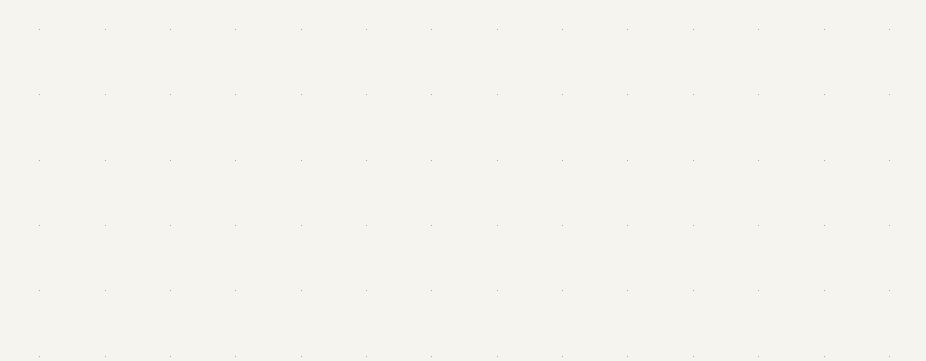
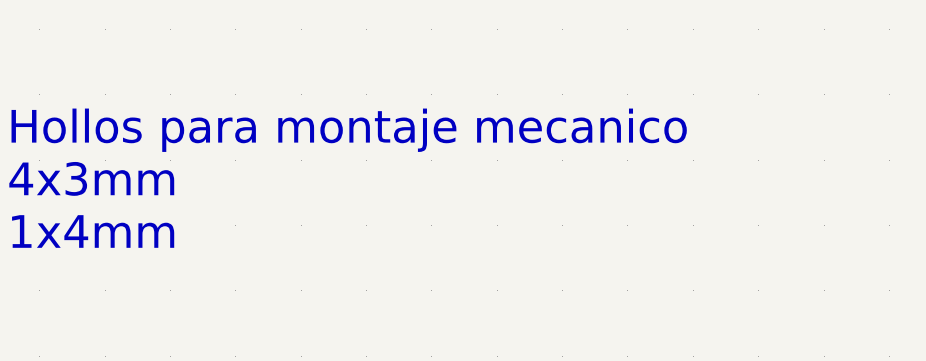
text: none -> Hollos para montaje mecanico (349, 130)
text: none -> 4x3mm (91, 178)
text: none -> 1x4mm (93, 231)

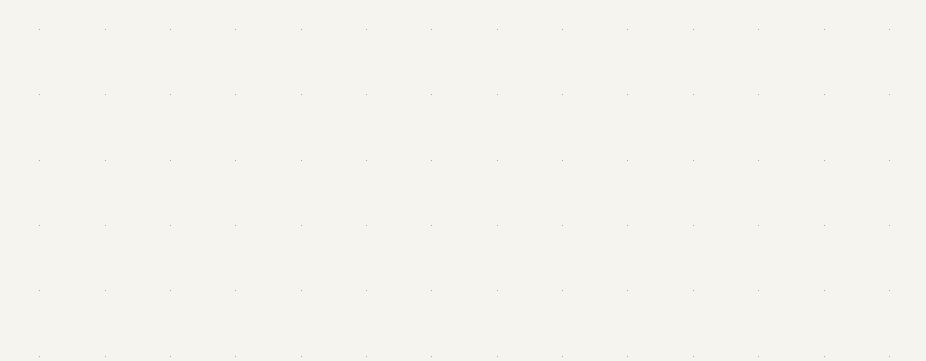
text: Hollos para montaje mecanico (349, 130) -> none
text: 4x3mm (91, 178) -> none
text: 1x4mm (93, 231) -> none

